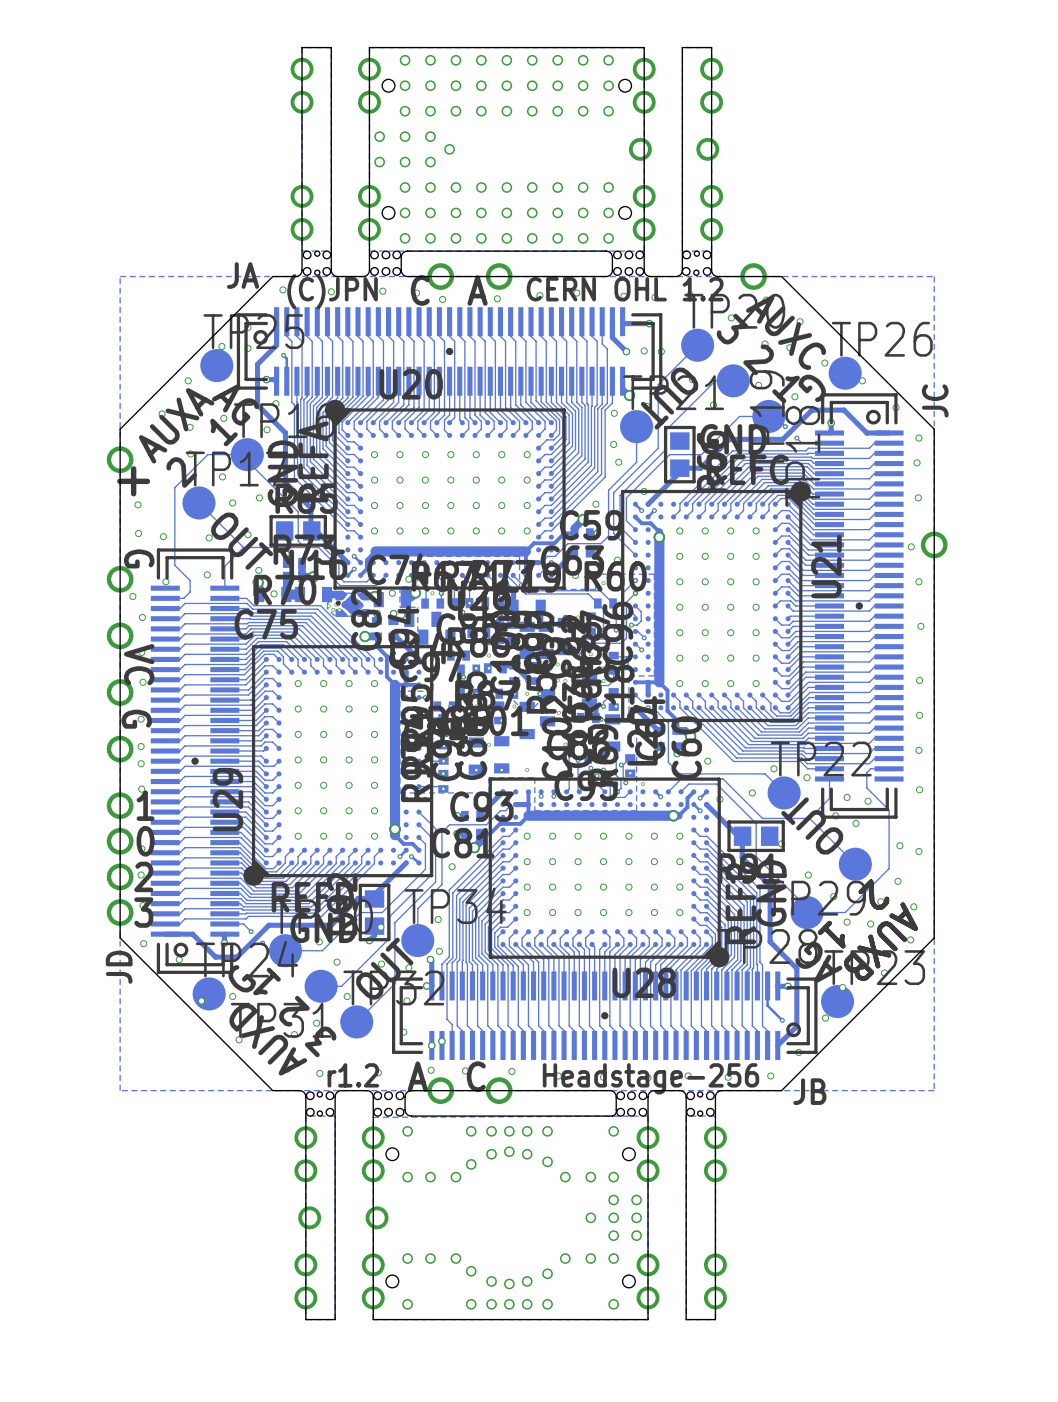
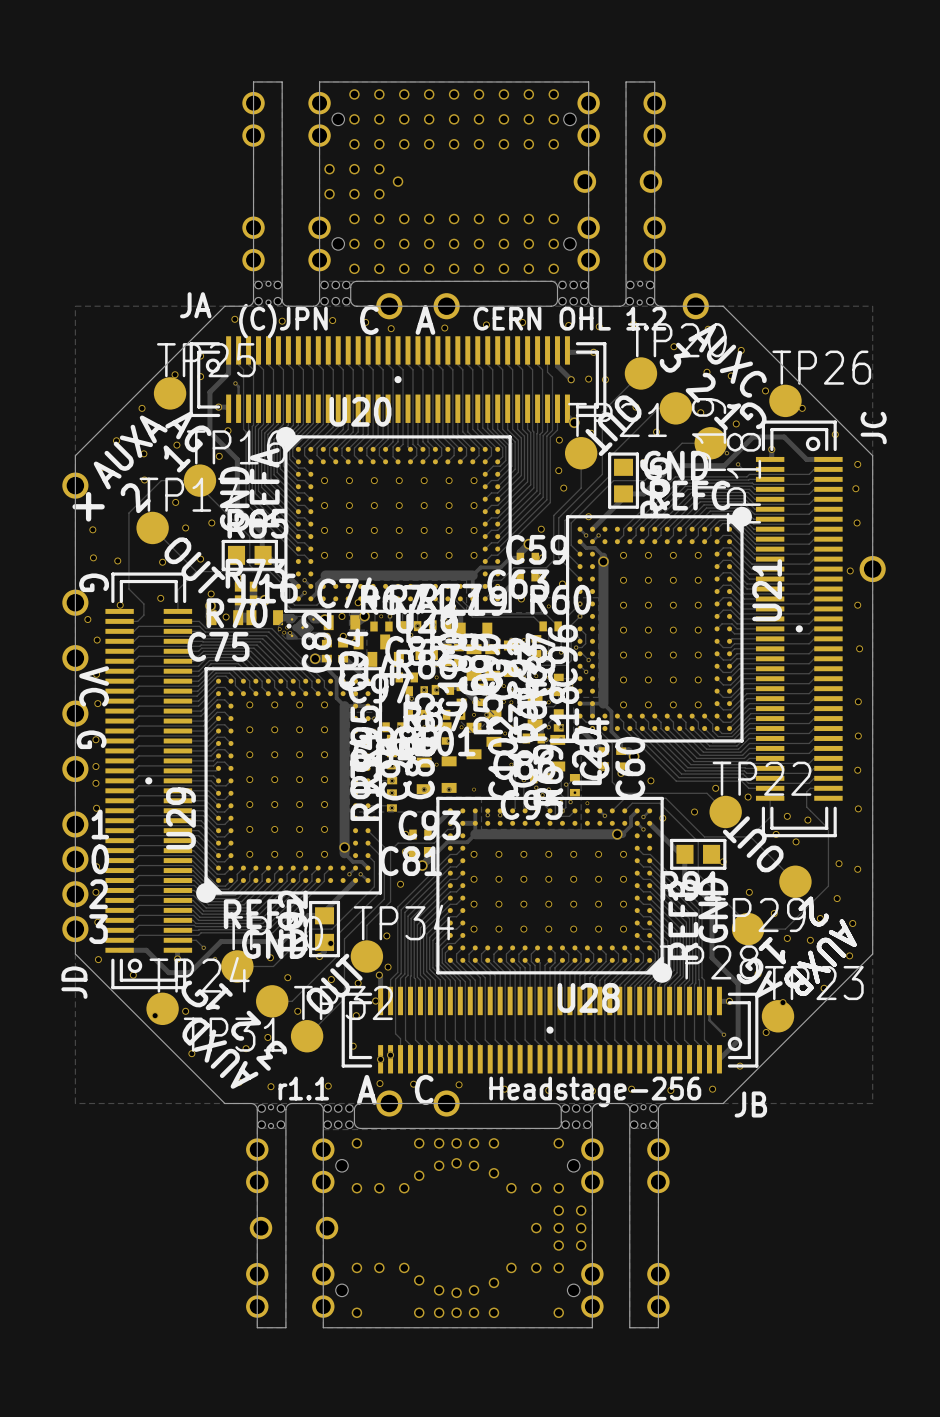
text: r1.2 (353, 1075) -> r1.1 (303, 1088)

